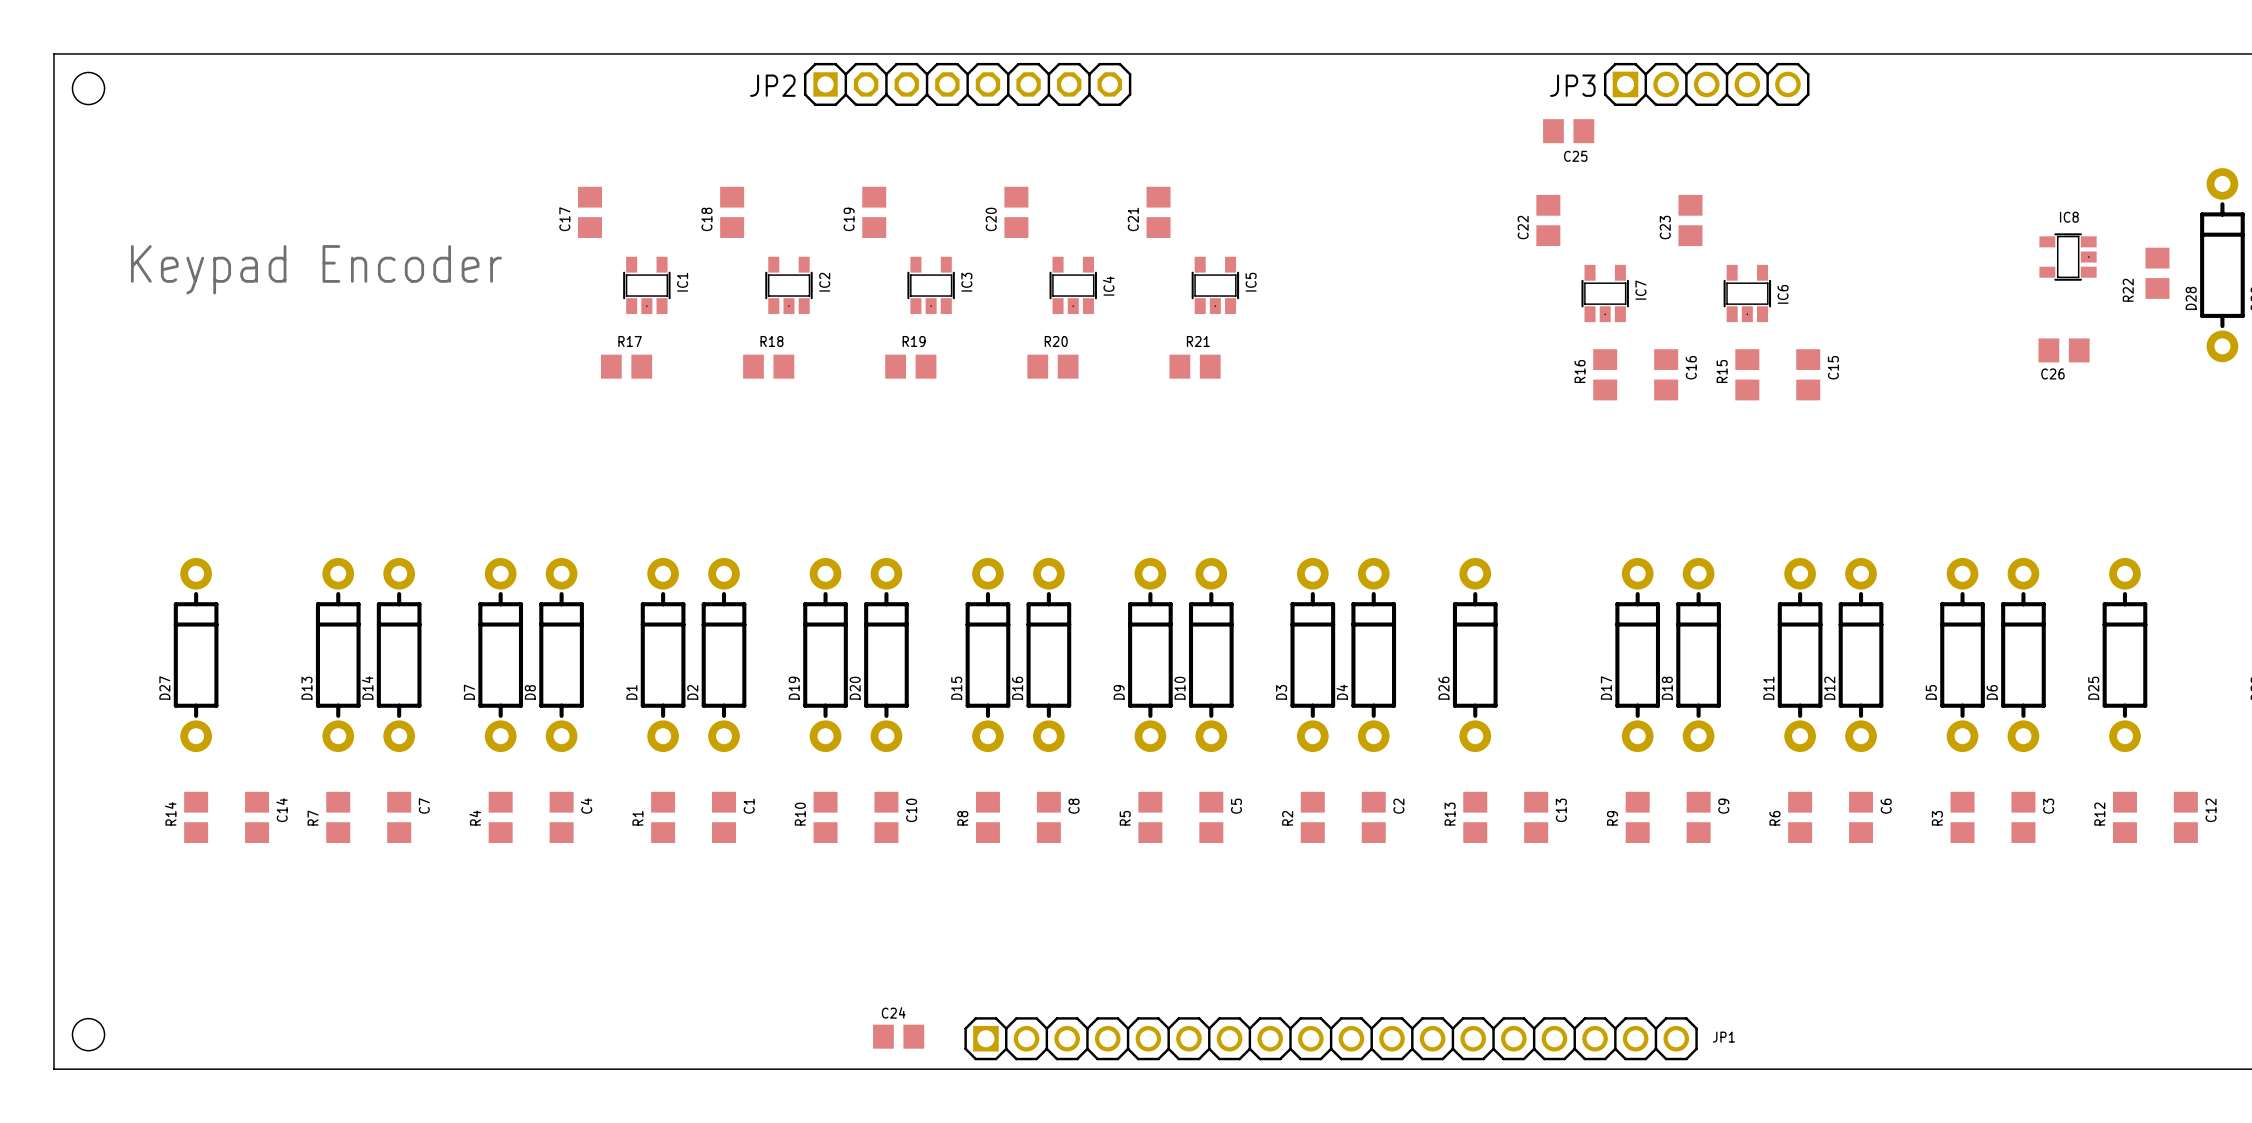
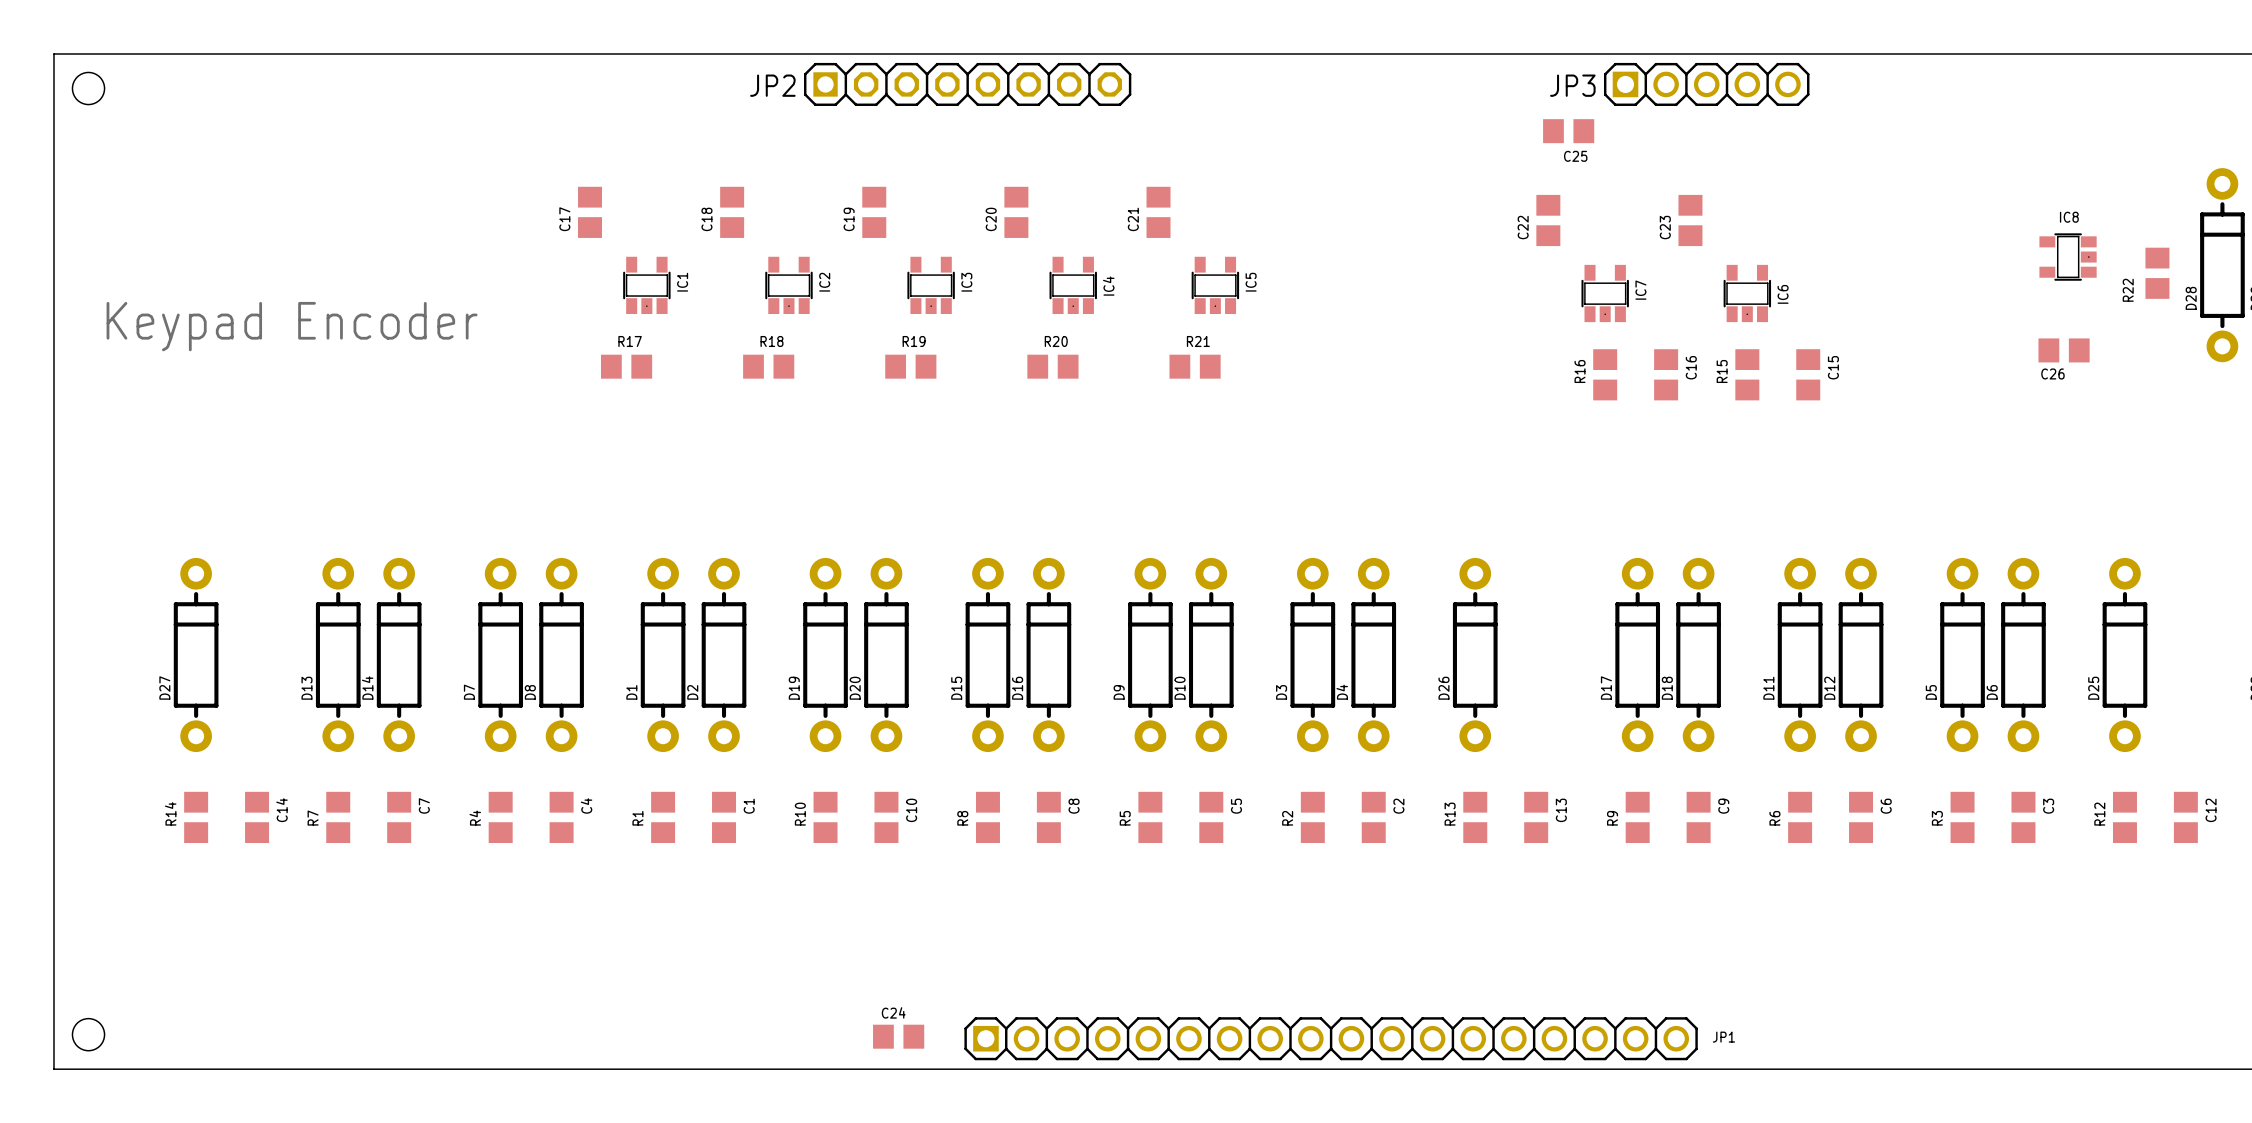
text position: Keypad Encoder (316, 269) -> Keypad Encoder (292, 326)

